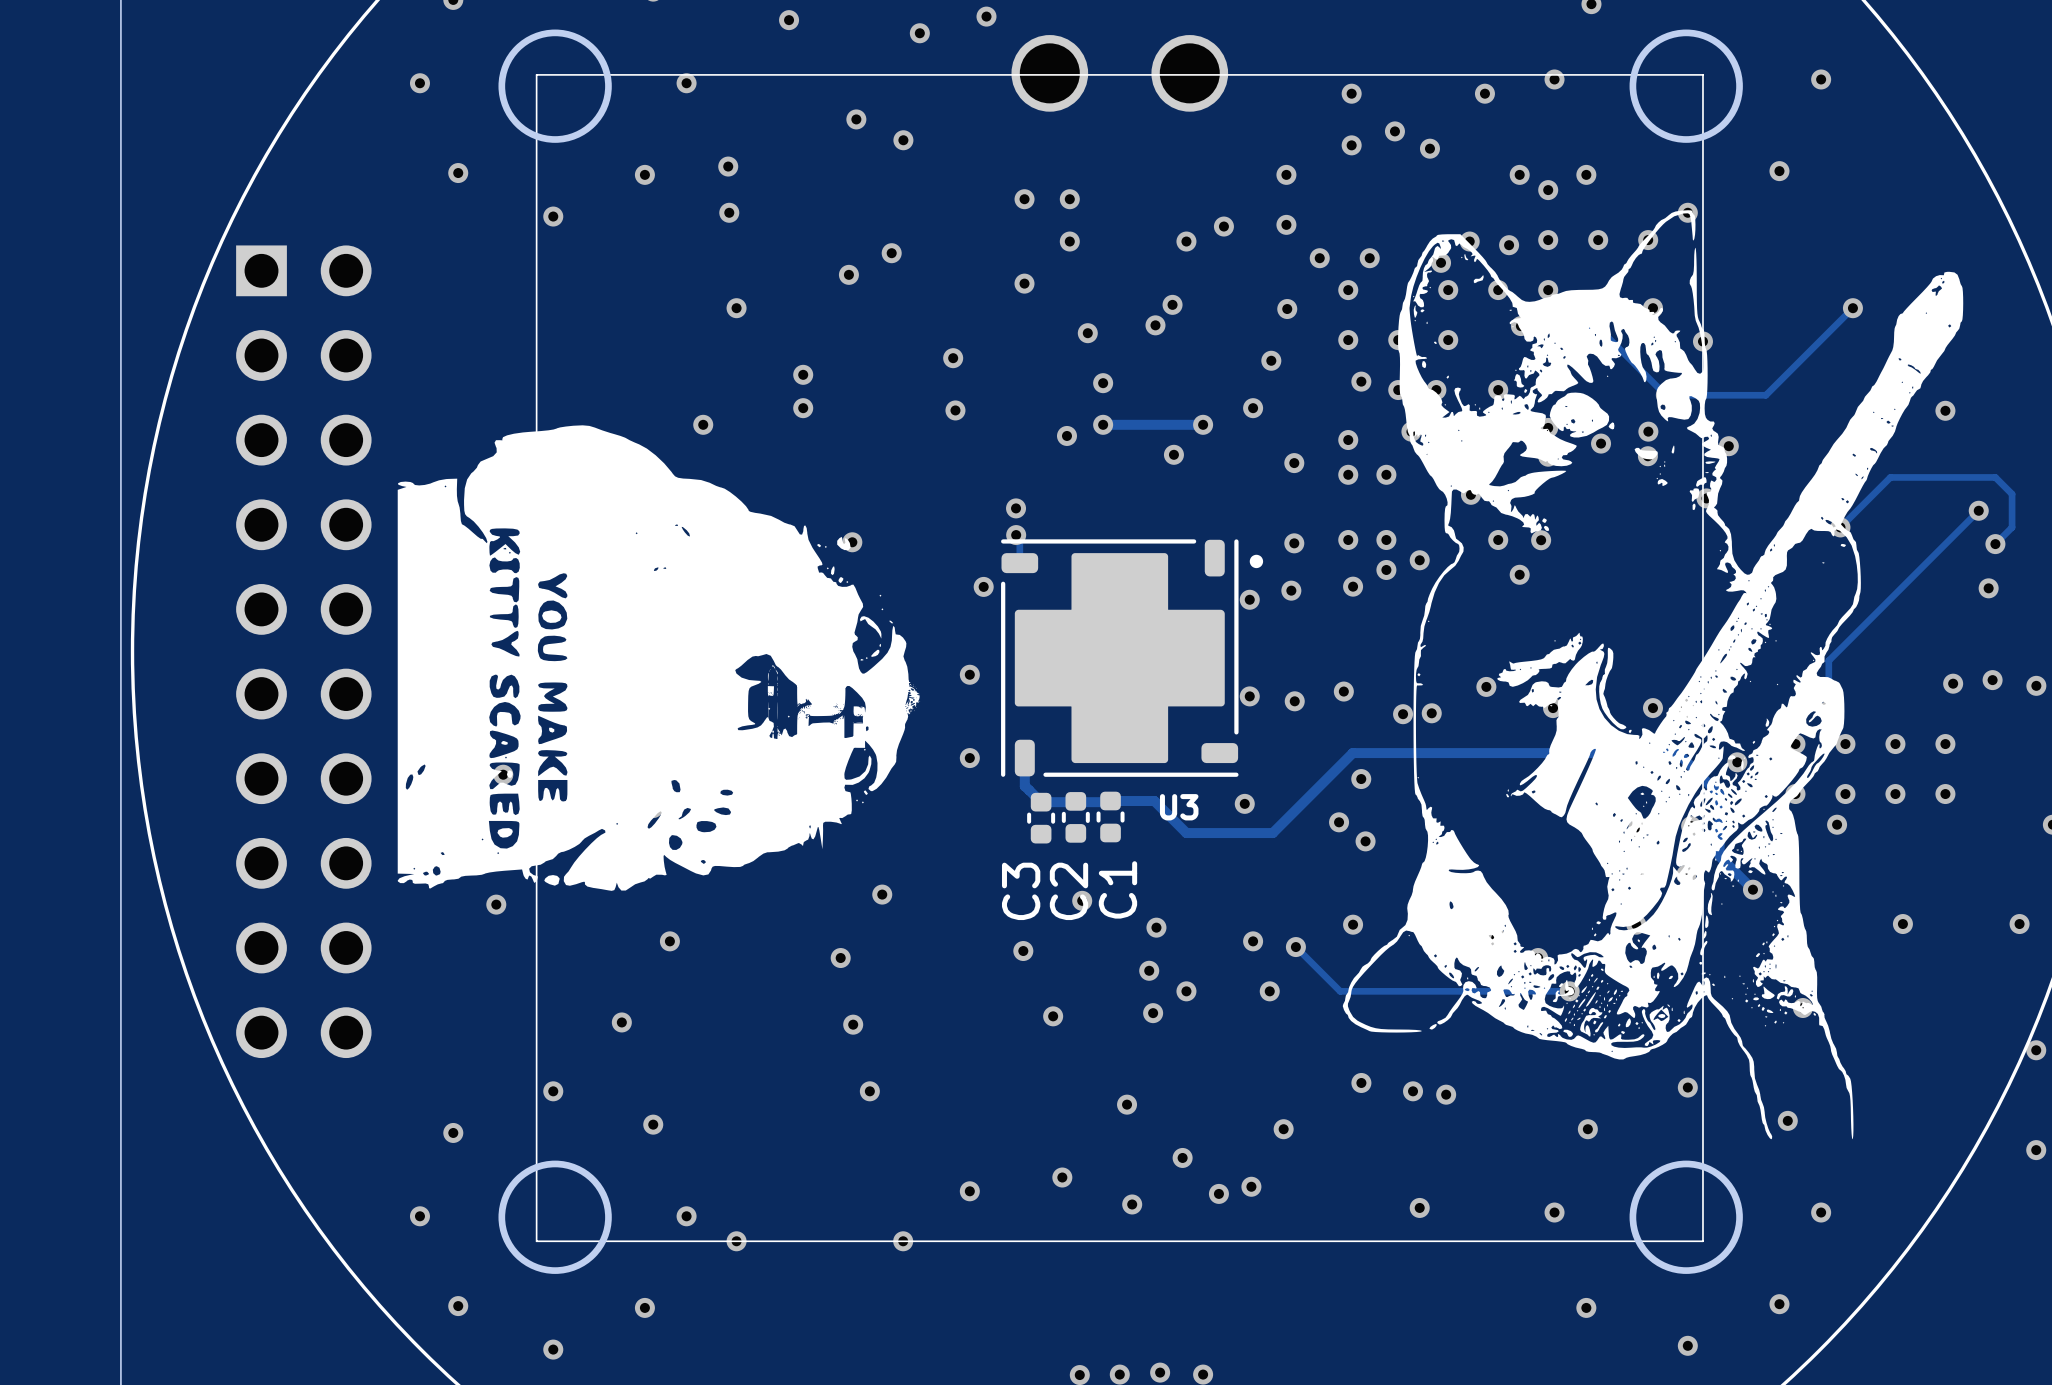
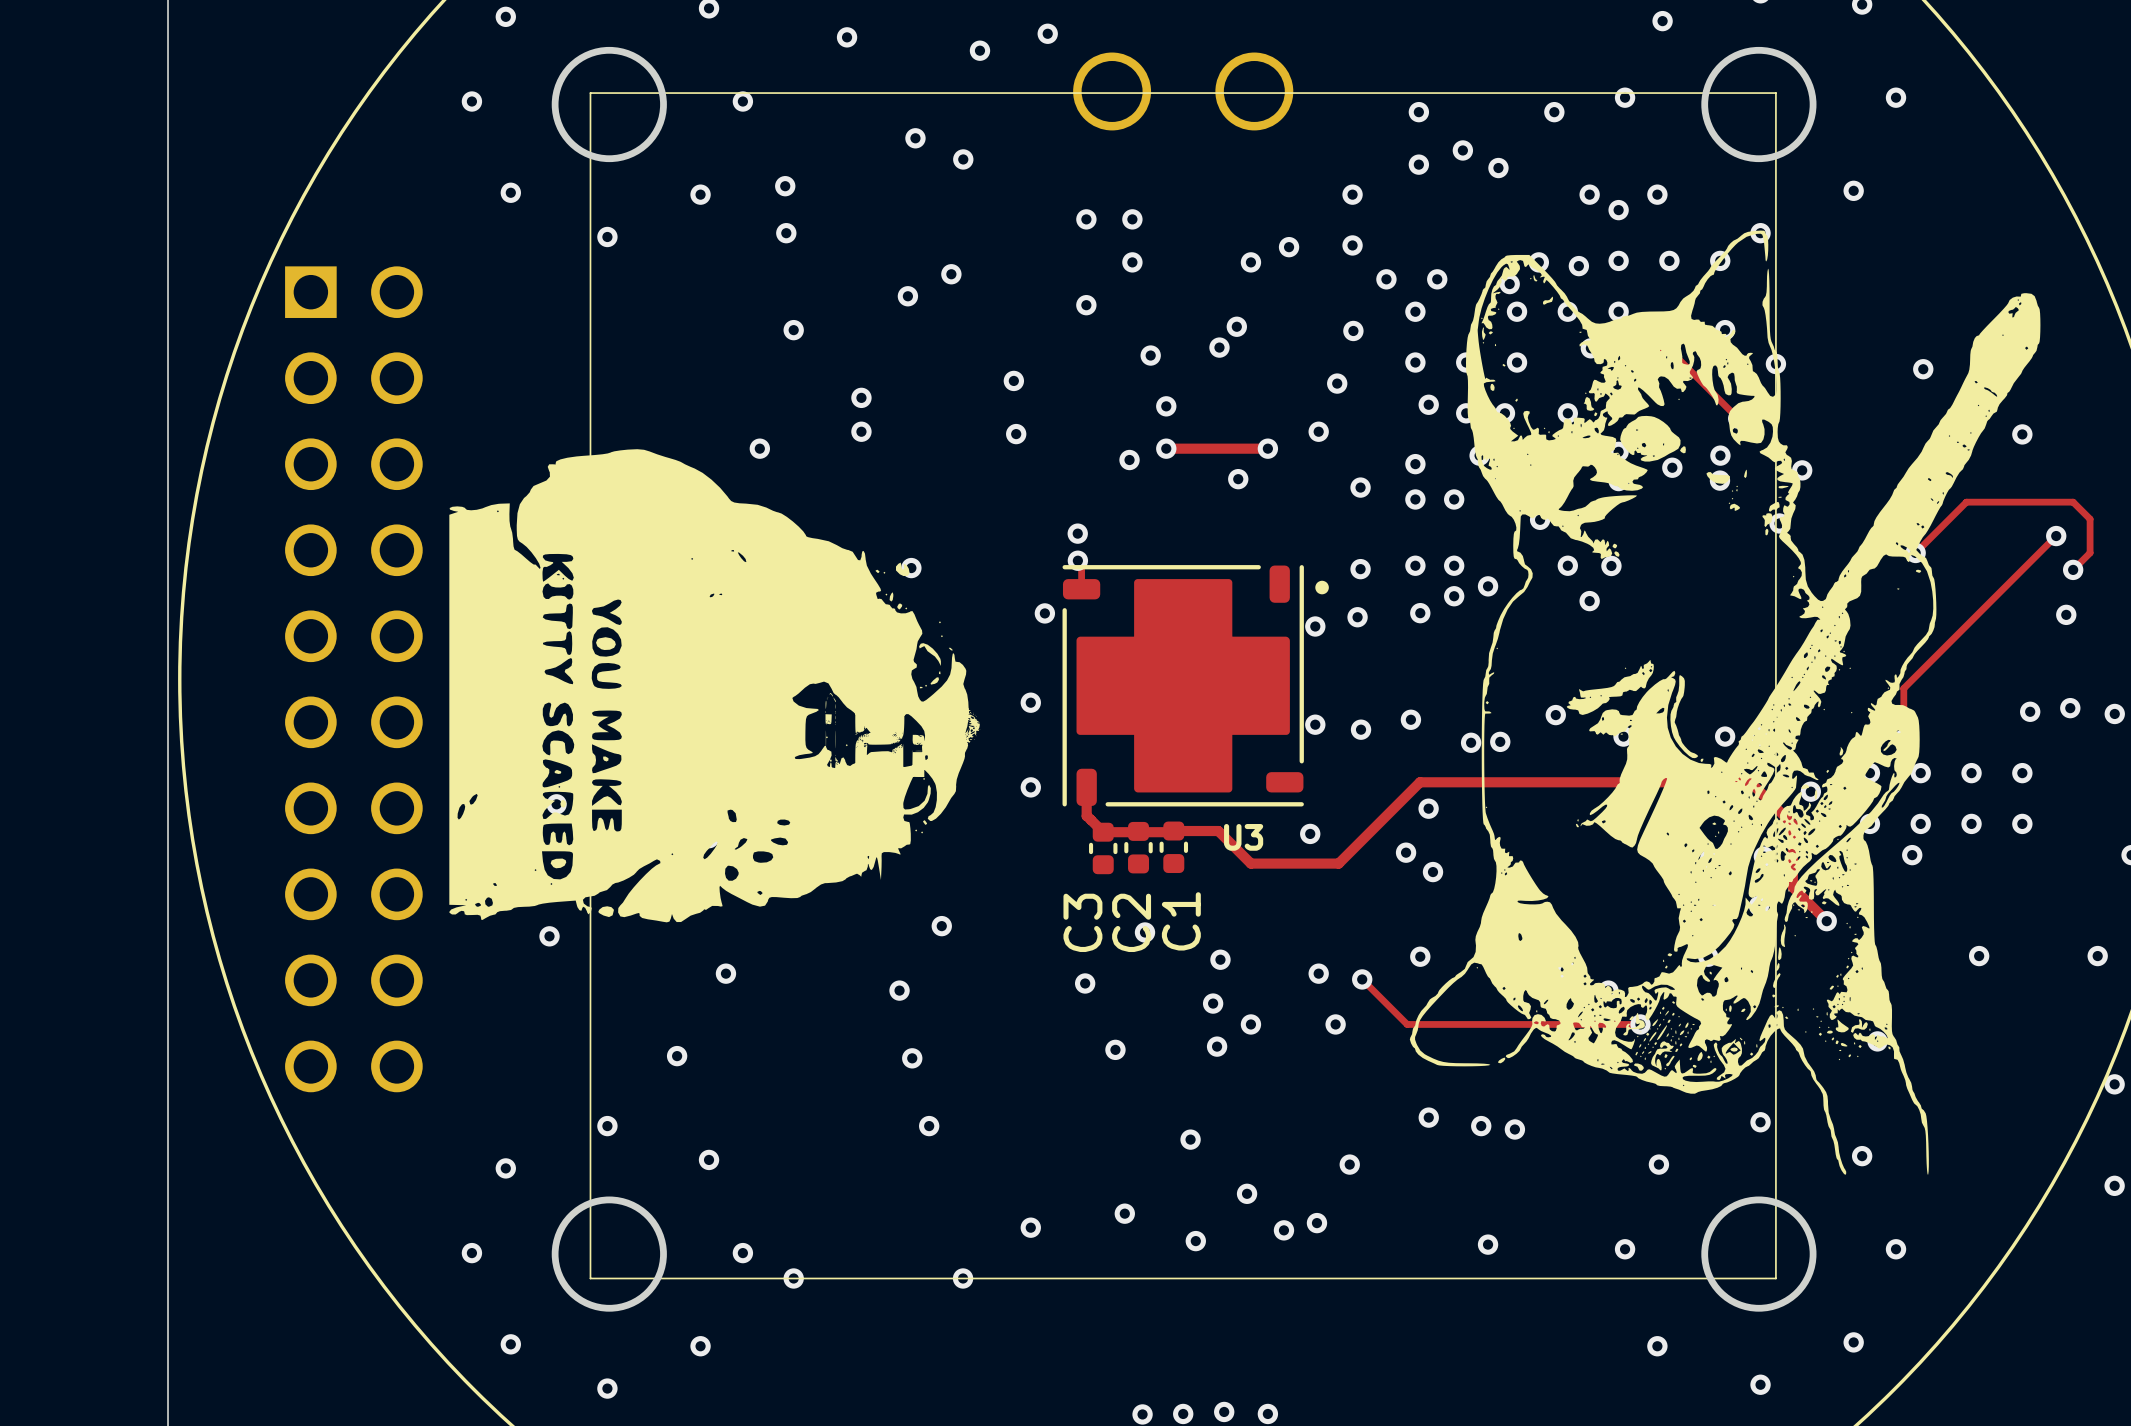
track: (1852, 308) (1765, 395) (1665, 395) -> none
via position: (1852, 308) -> (1923, 369)

